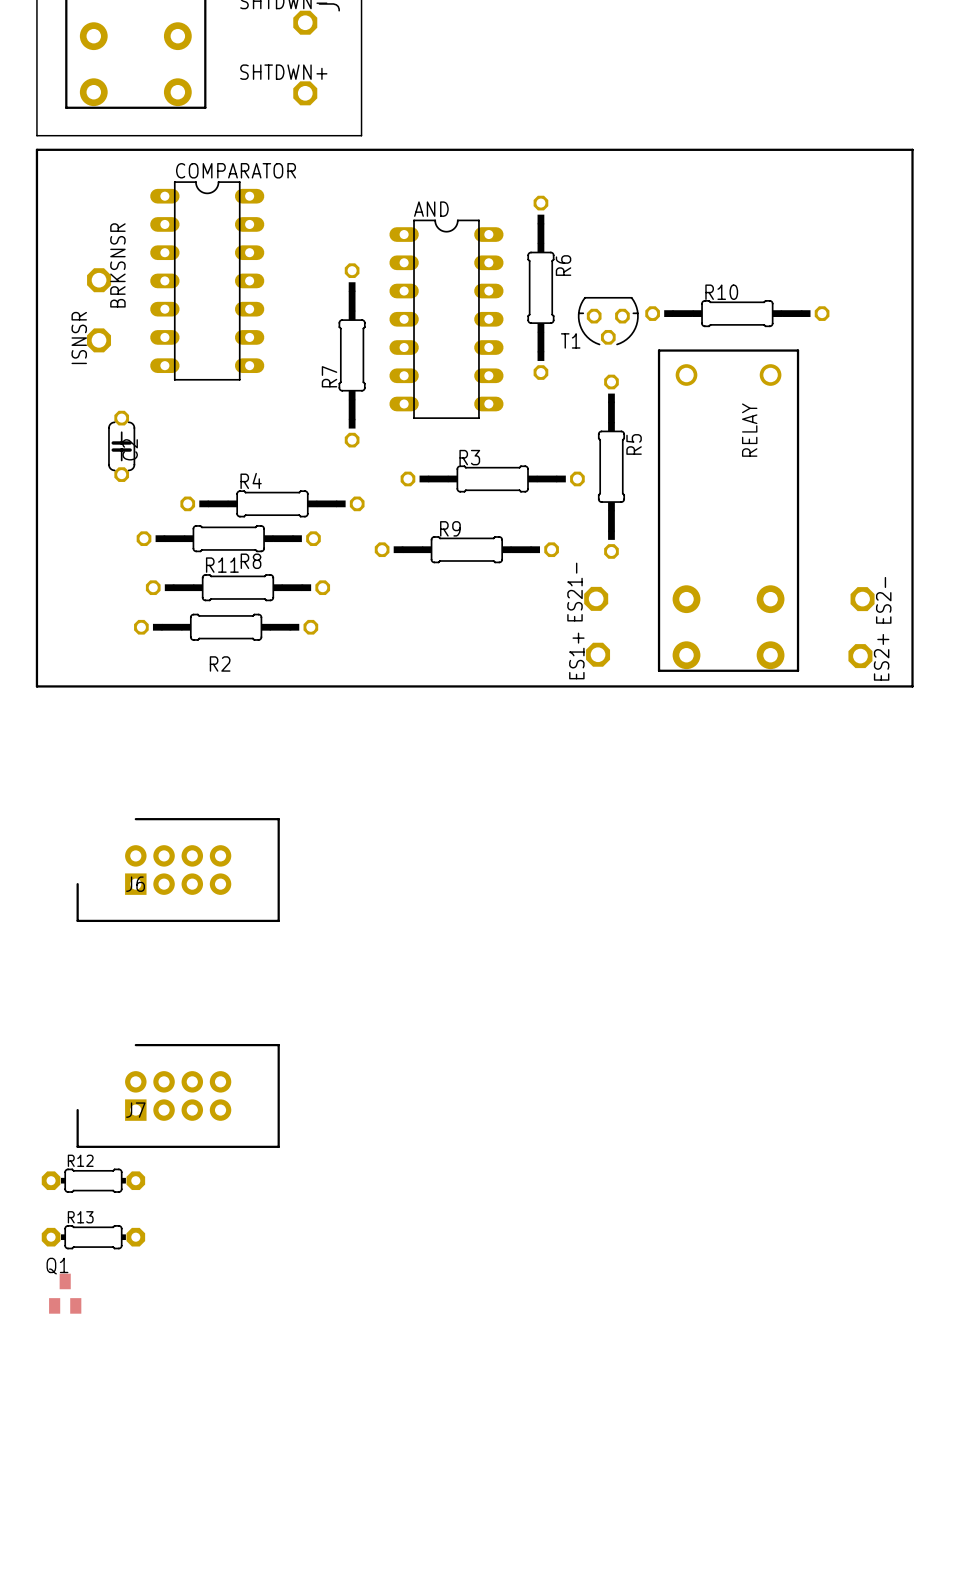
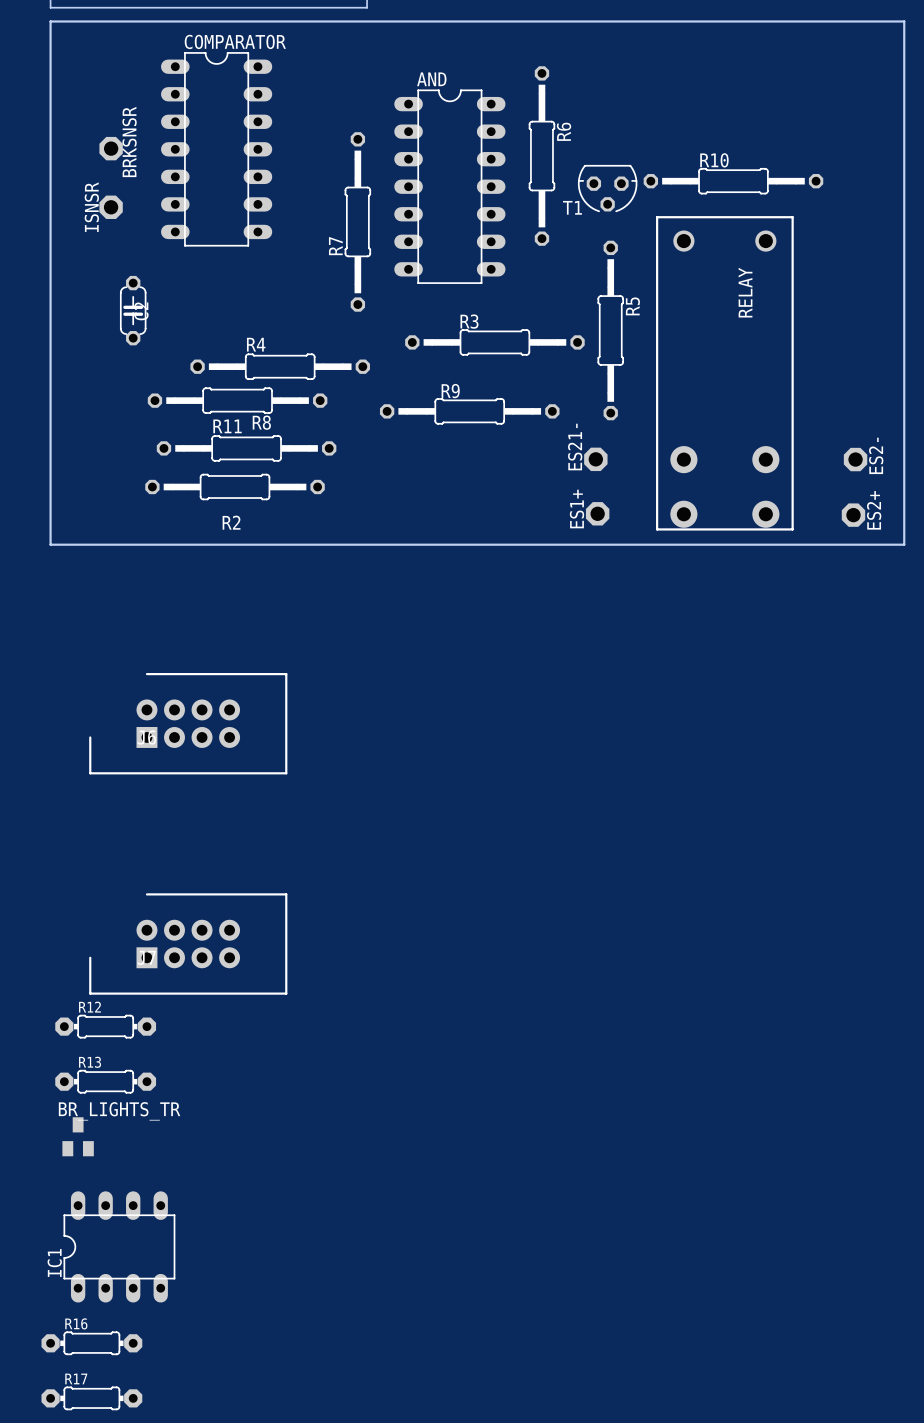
Q1 name: Q1 (57, 1266) -> BR_LIGHTS_TR (119, 1111)
IC1: none -> (119, 1246)
R16: none -> (91, 1343)
R17: none -> (91, 1398)

